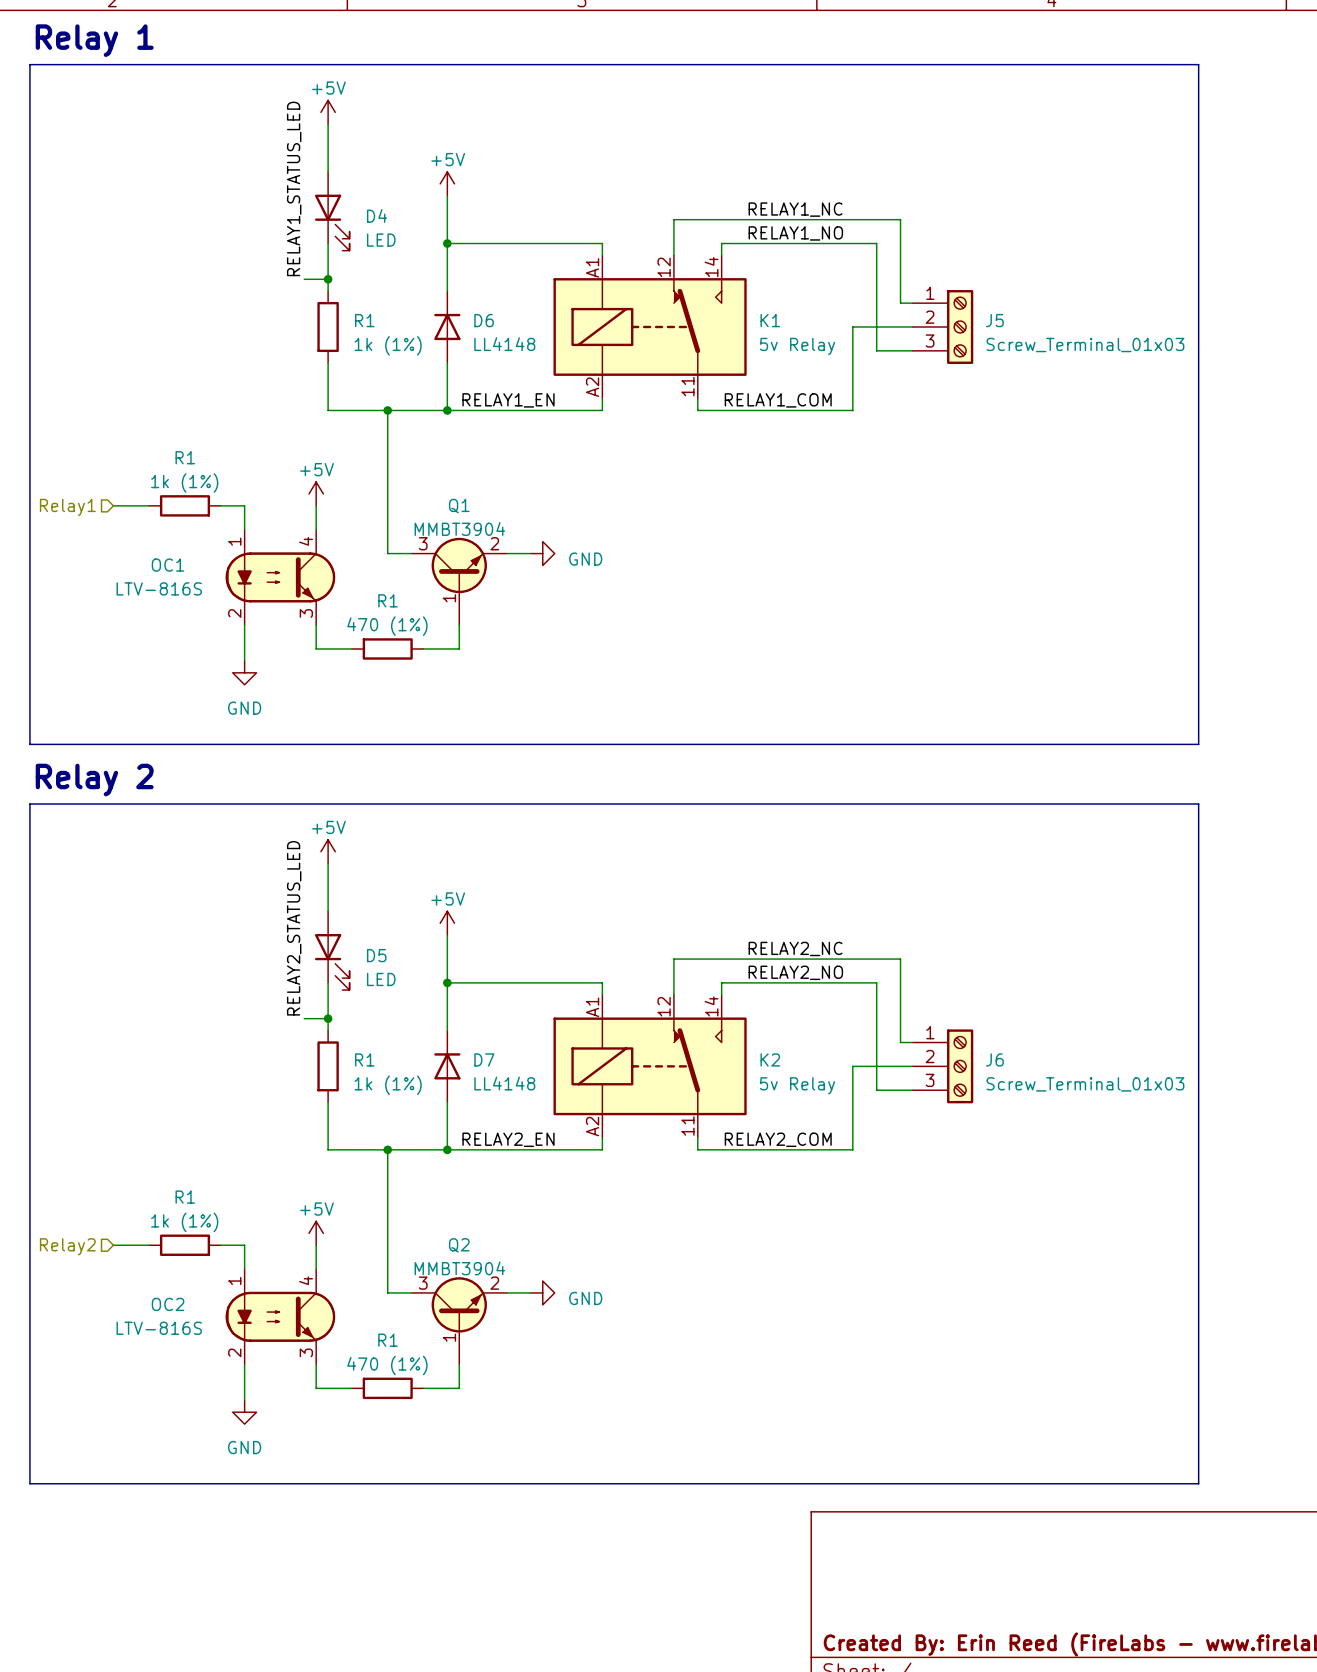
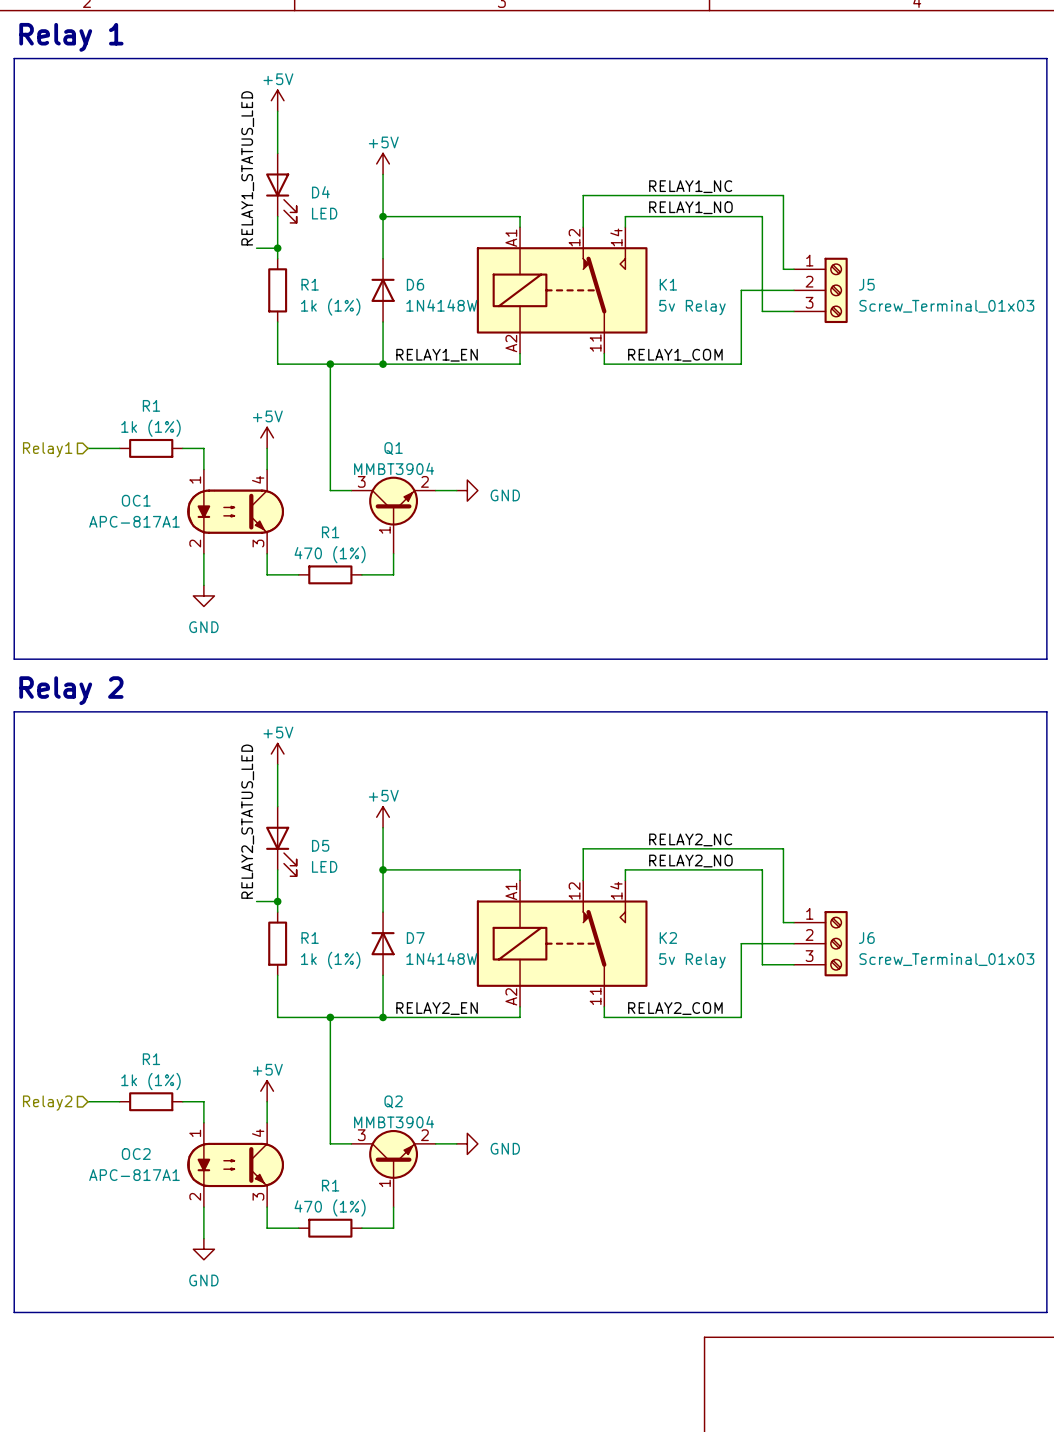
D6 value: LL4148 (504, 344) -> 1N4148W (441, 305)
OC1 value: LTV-816S (159, 588) -> APC-817A1 (134, 521)
D7 value: LL4148 (504, 1083) -> 1N4148W (441, 958)
OC2 value: LTV-816S (159, 1328) -> APC-817A1 (134, 1175)

